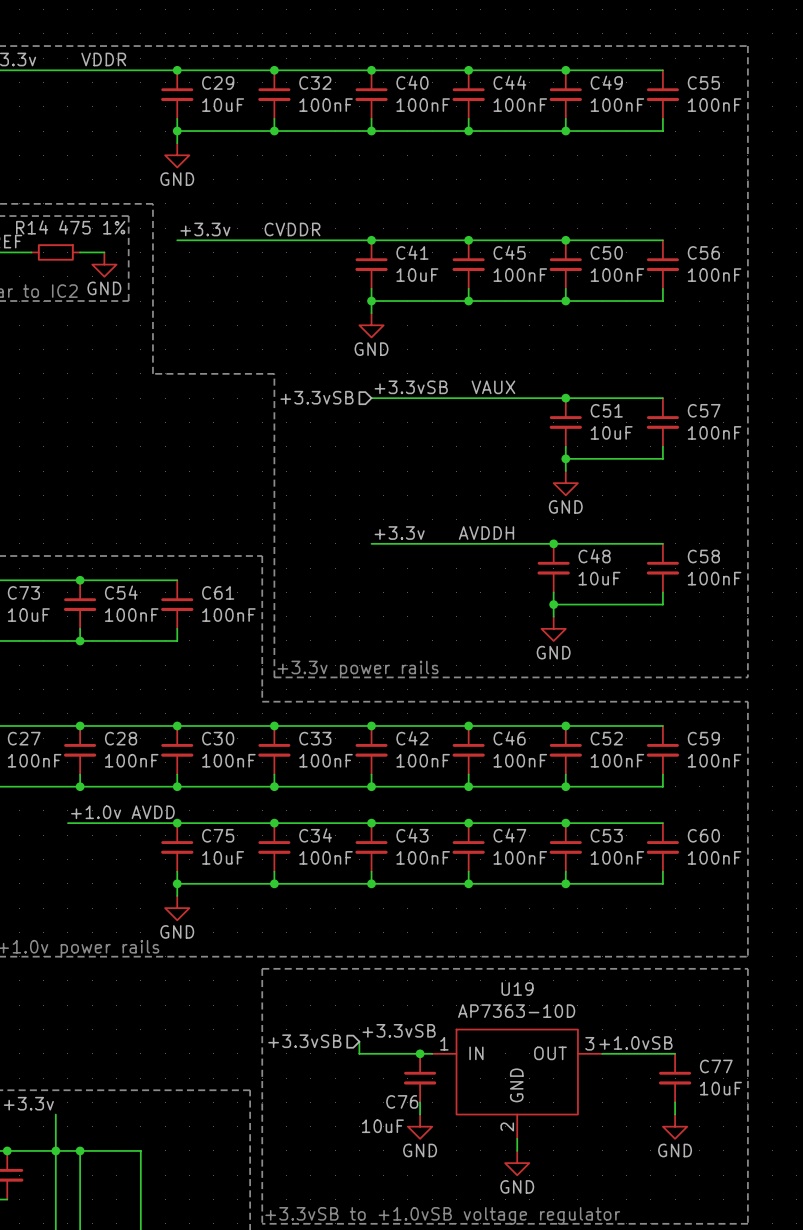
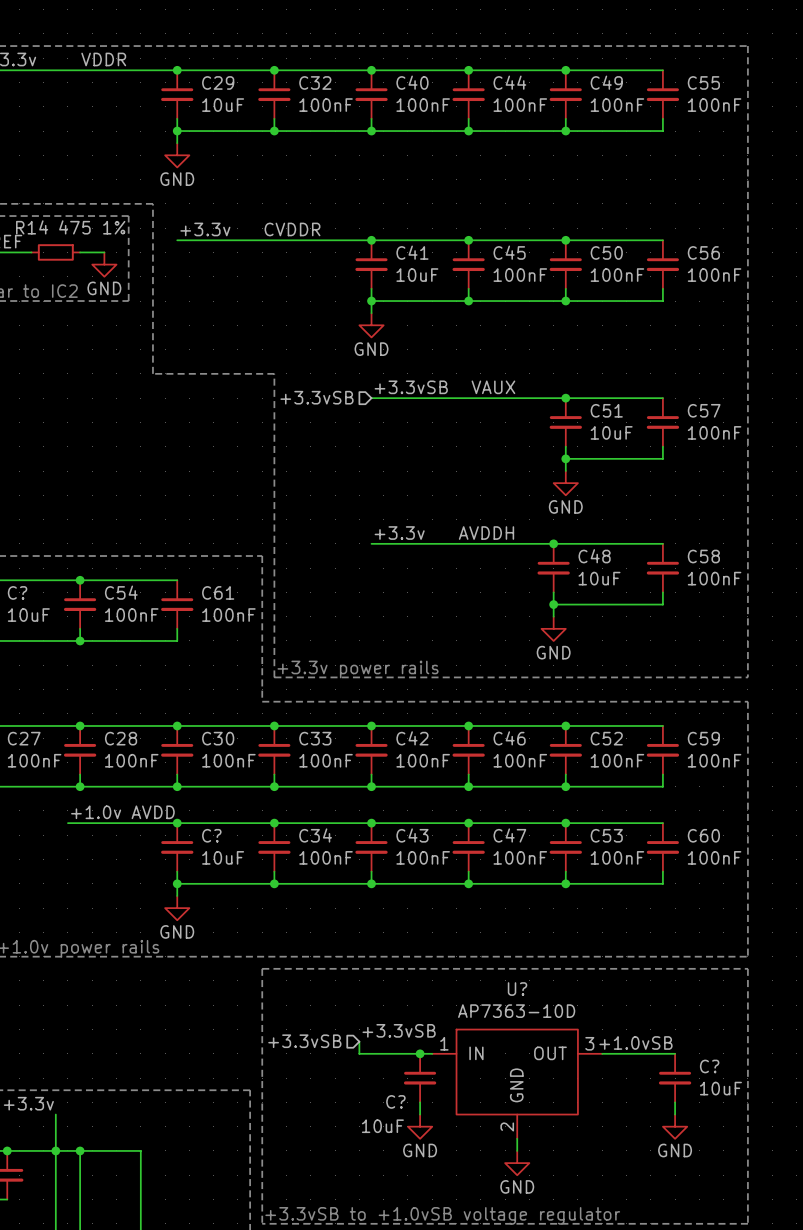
C73 name: C73 (23, 592) -> C? (17, 592)
C75 name: C75 (218, 835) -> C? (211, 835)
U19 name: U19 (517, 989) -> U? (517, 989)
C77 name: C77 (716, 1066) -> C? (709, 1066)
C76 name: C76 (402, 1101) -> C? (395, 1101)

